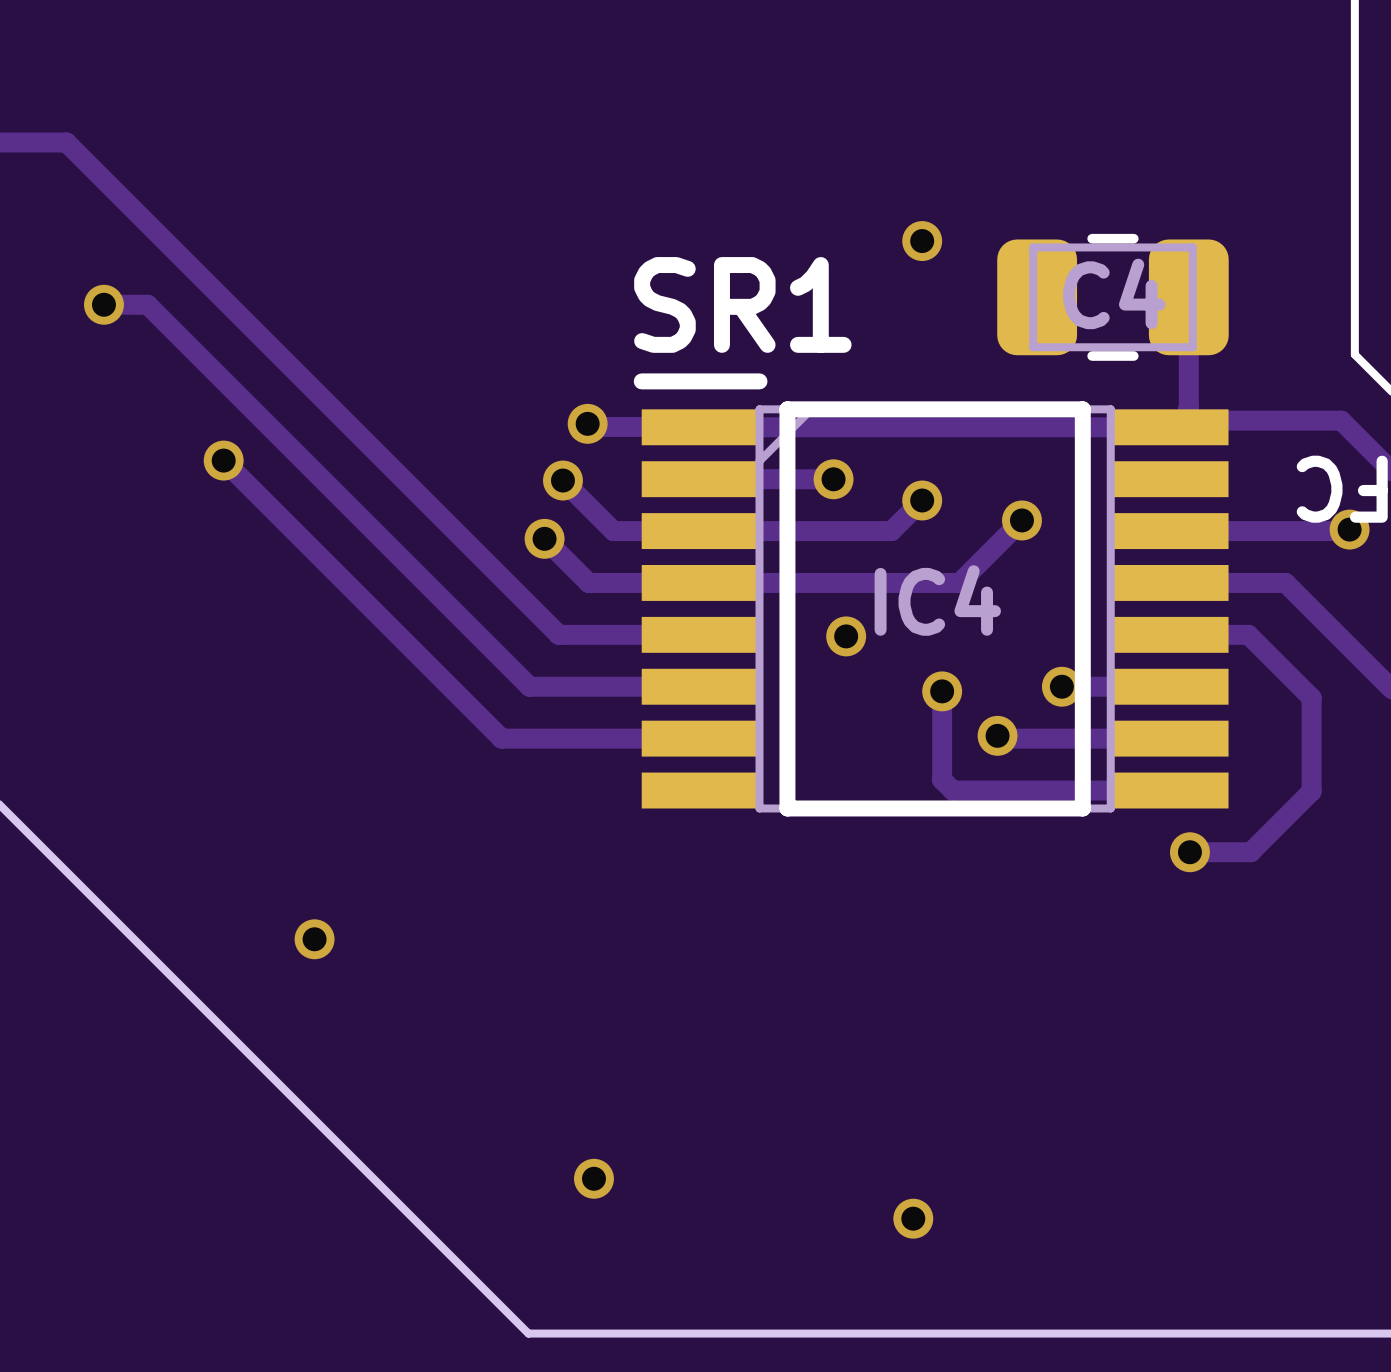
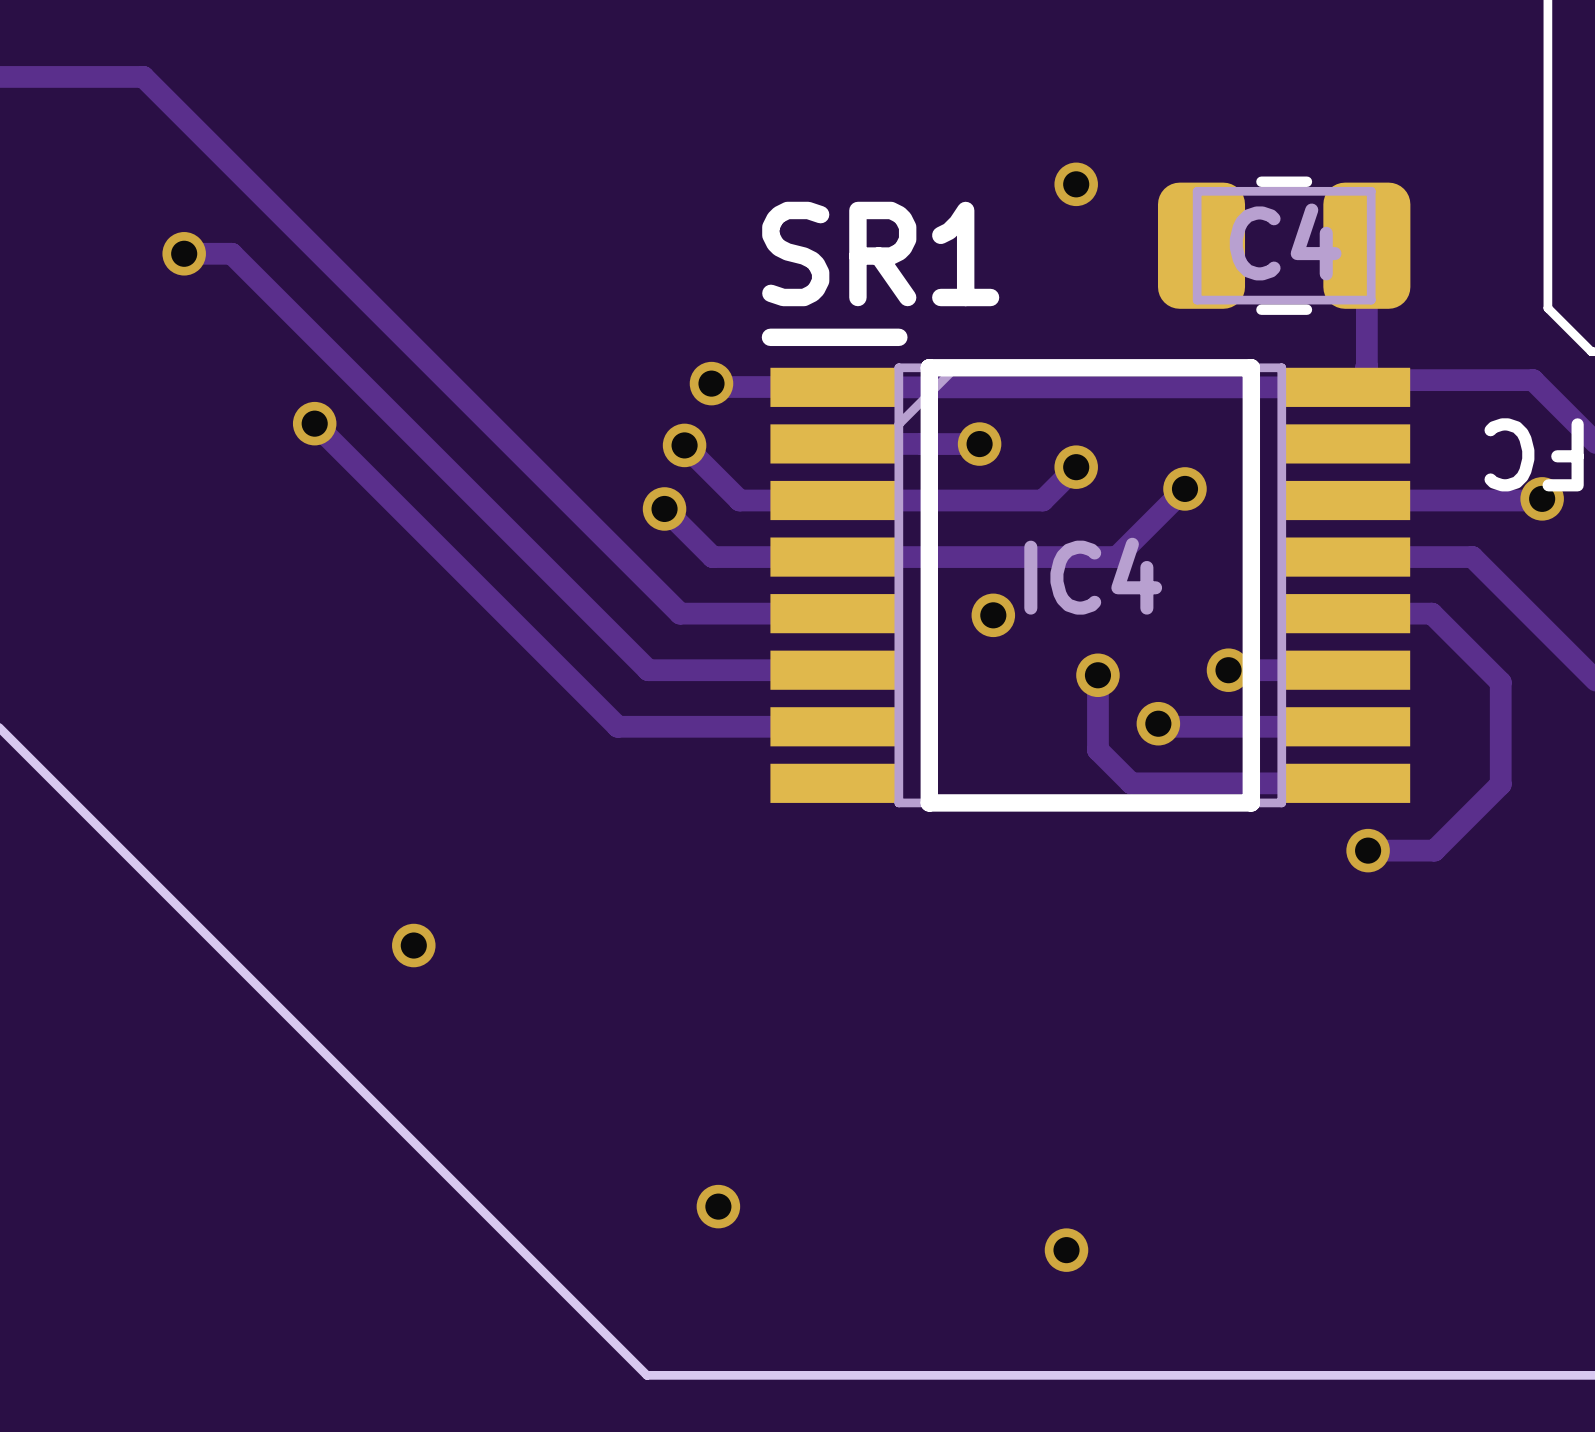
track: (942, 759) (942, 779) (952, 790) (972, 790) -> (1097, 750) (1131, 783)

